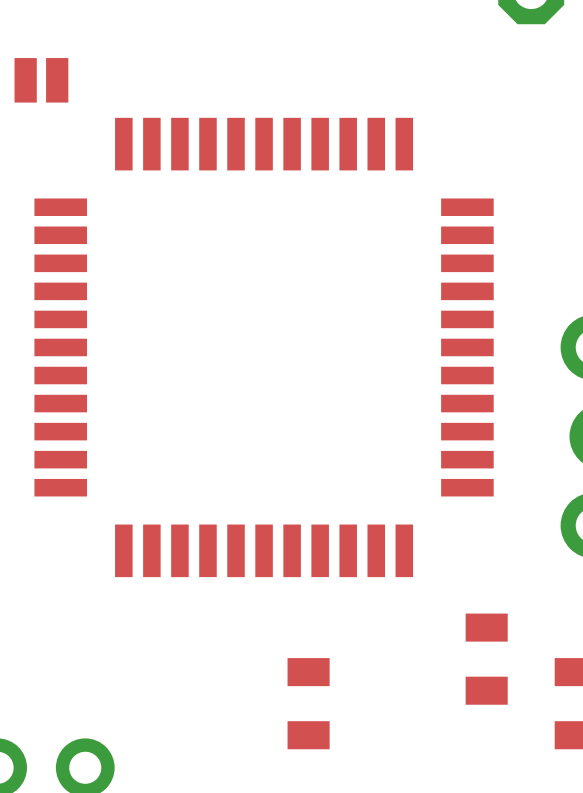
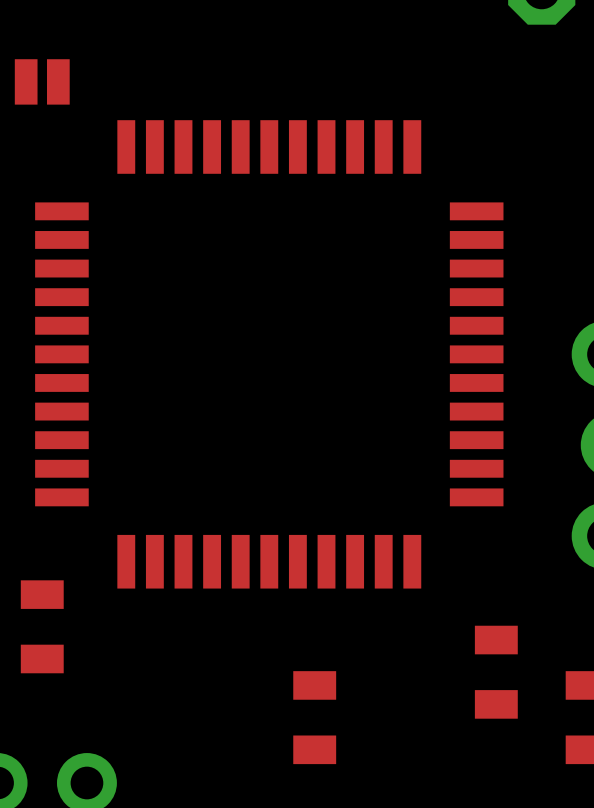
part: none -> (42, 626)

